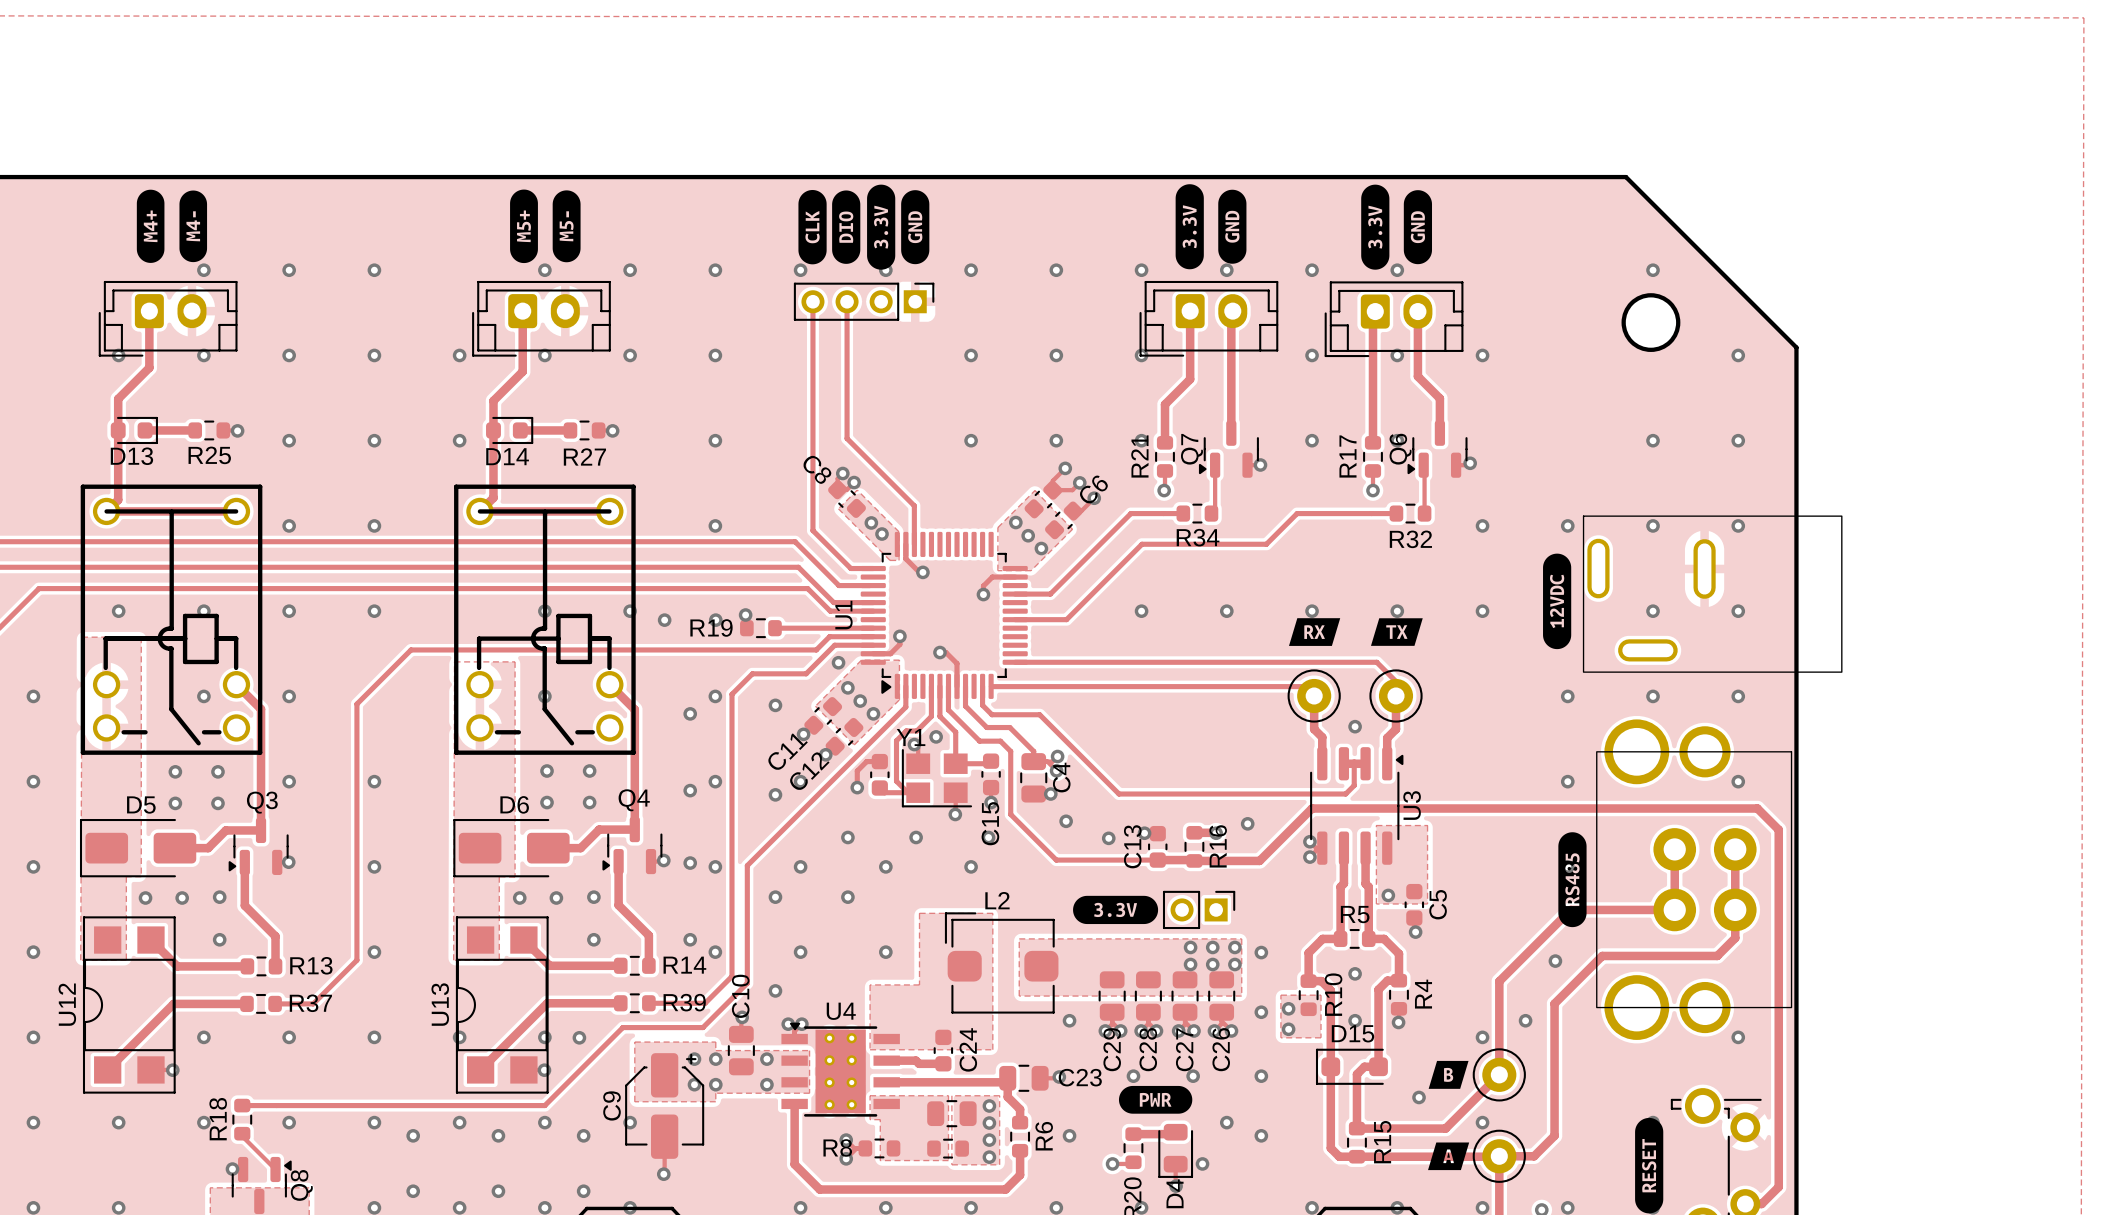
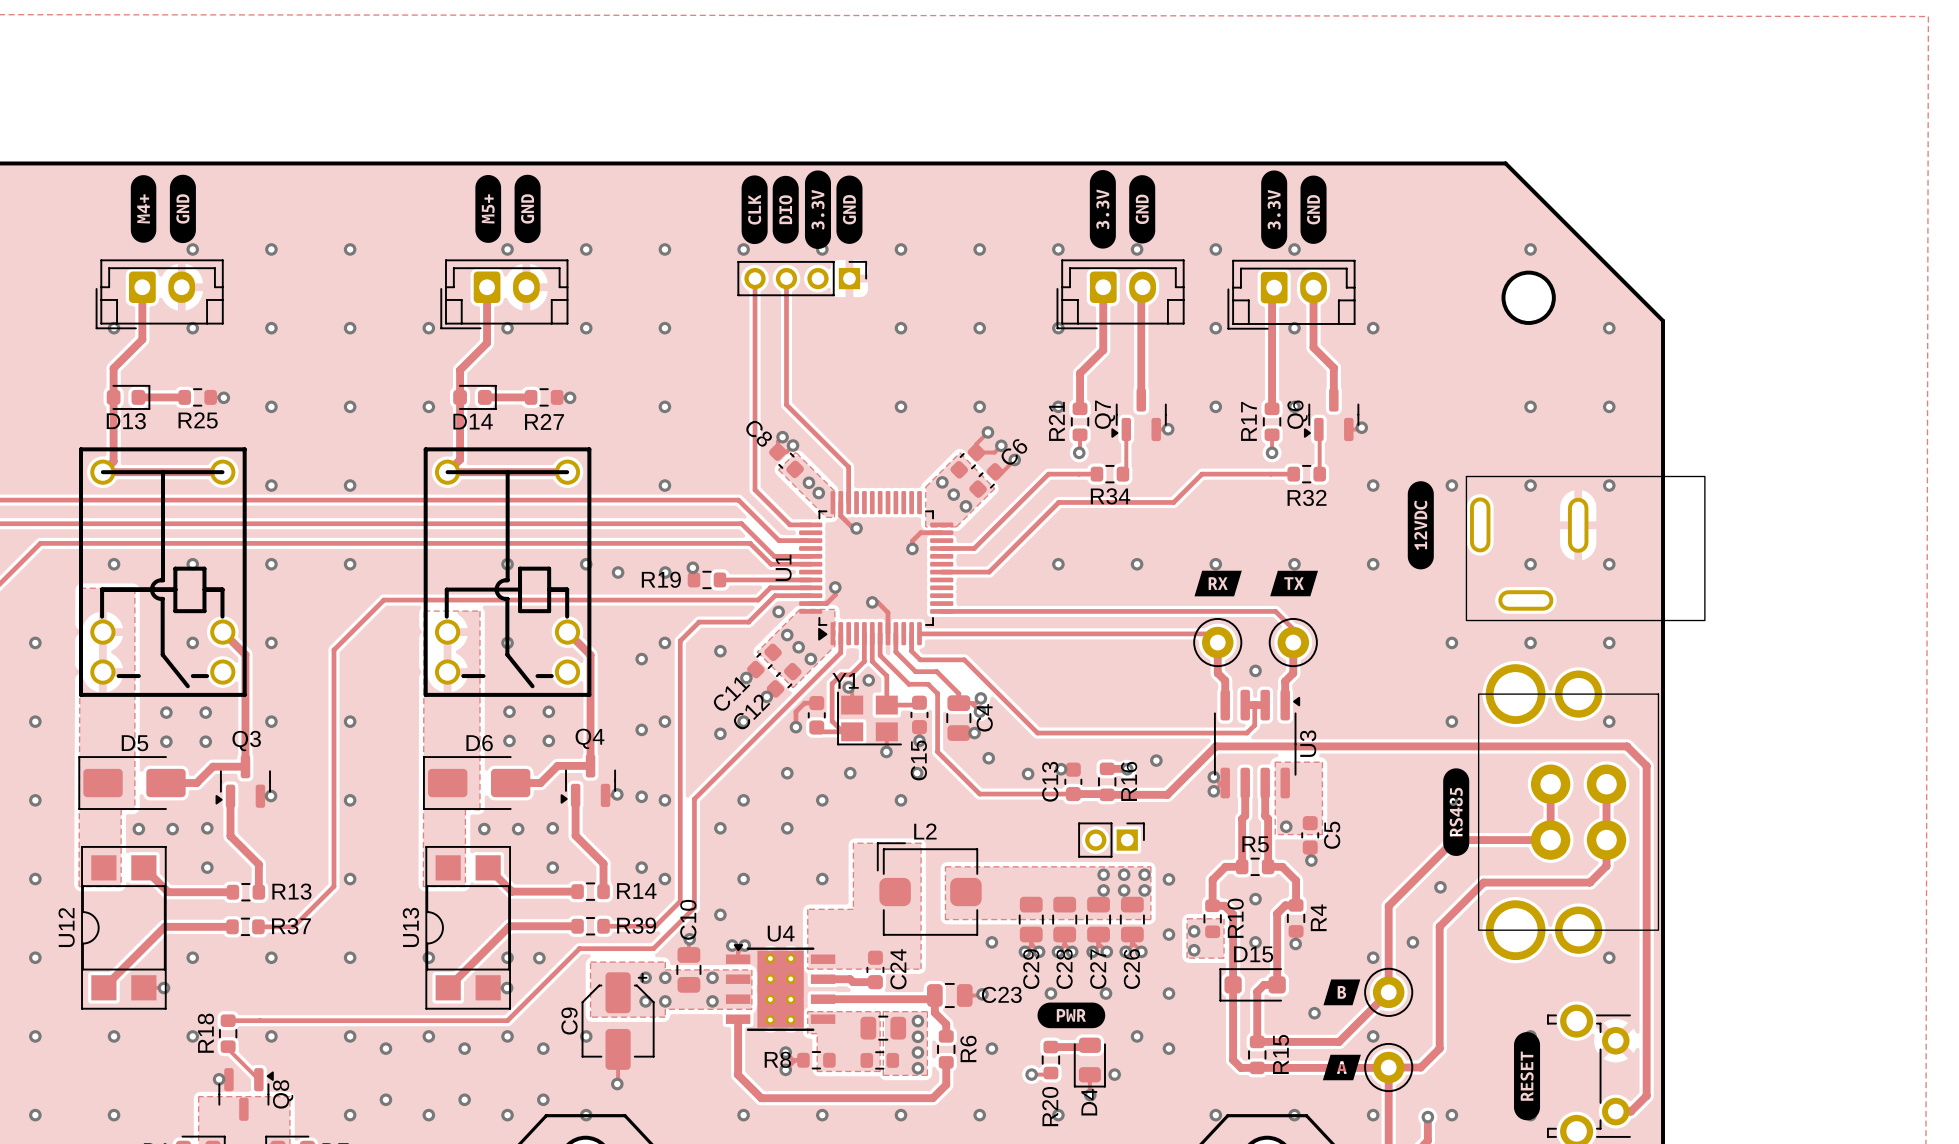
drawing shape: [179, 190, 208, 263] -> [169, 174, 196, 244]
drawing shape: [552, 190, 581, 263] -> [514, 174, 541, 244]
drawing position: (1557, 601) -> (1420, 525)
drawing: [1073, 895, 1159, 925] -> none

